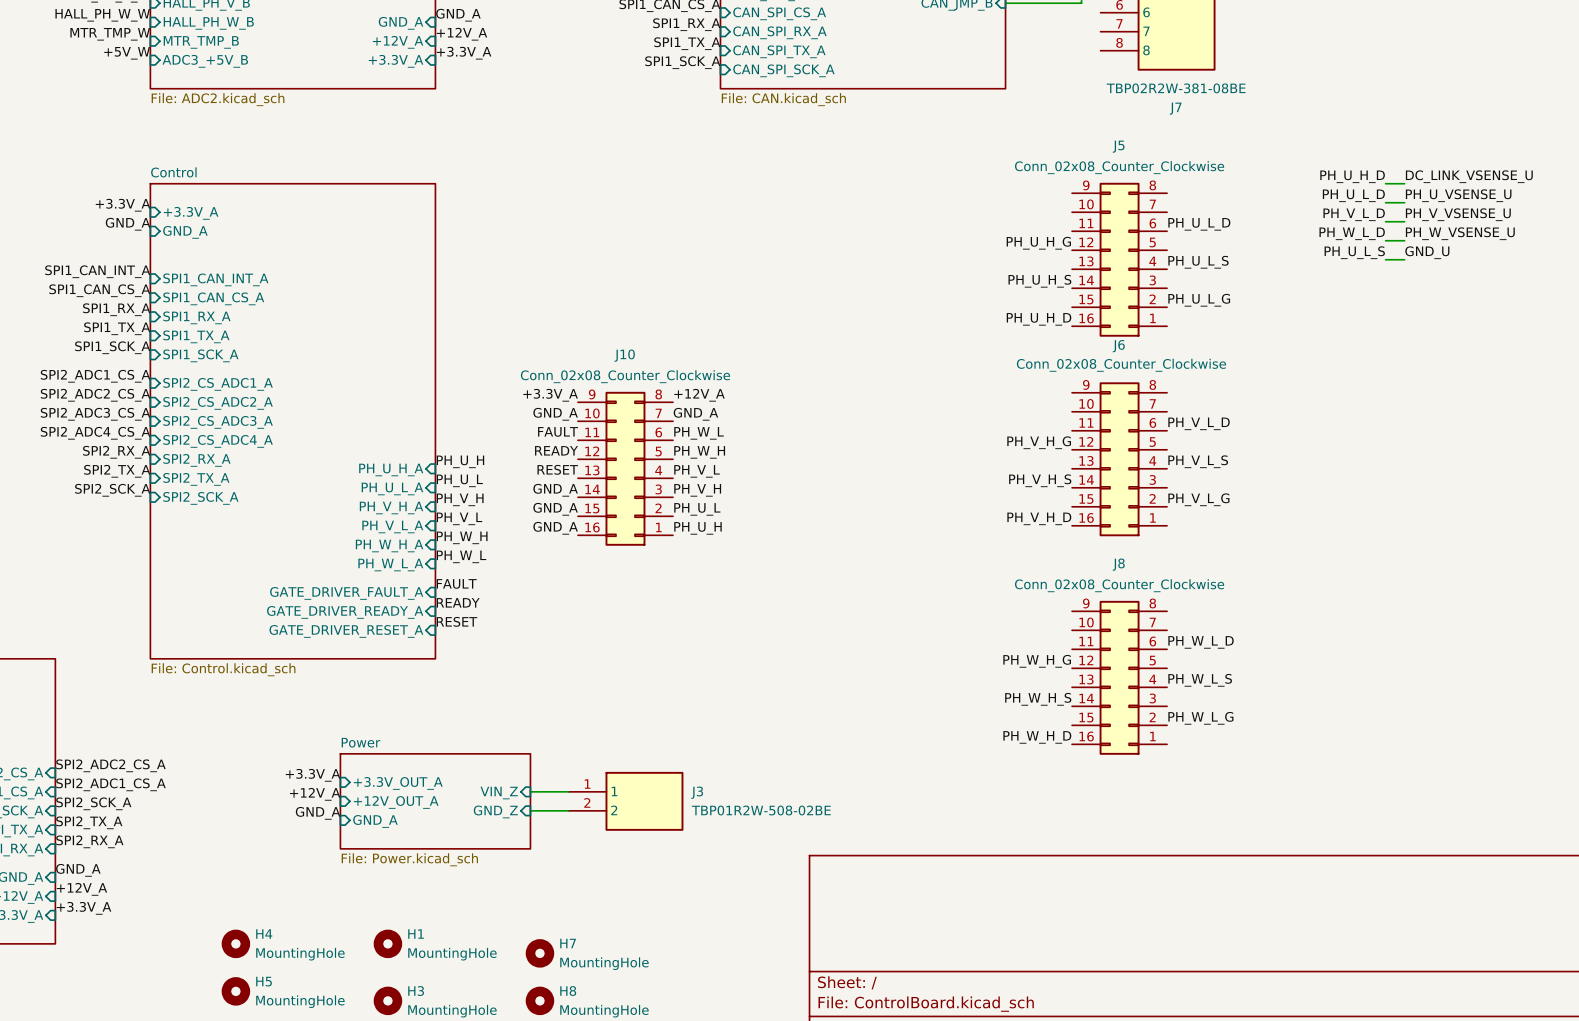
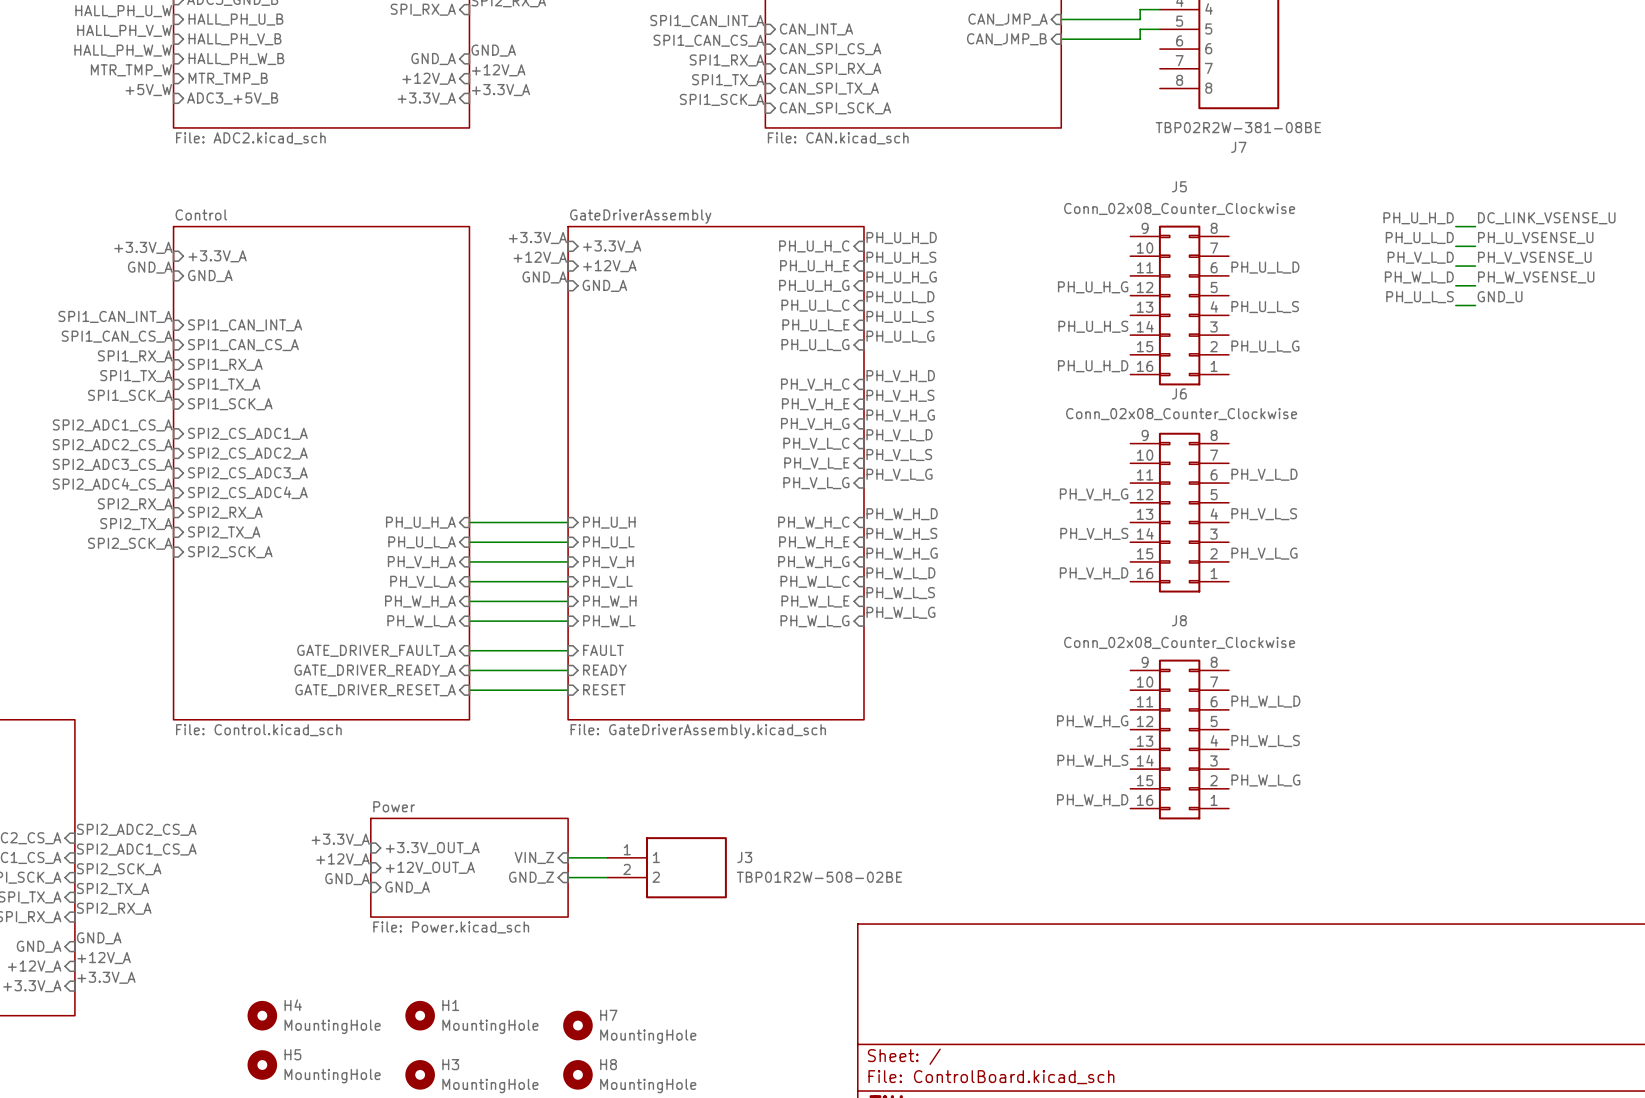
label: none -> +3.3V_A (537, 237)
label: none -> PH_U_H_D (901, 237)
sheet pin: none -> +3.3V_A (612, 246)
sheet pin: none -> PH_U_H_C (814, 246)
label: none -> +12V_A (540, 257)
label: none -> PH_U_H_S (901, 257)
sheet pin: none -> +12V_A (609, 266)
sheet pin: none -> PH_U_H_E (814, 266)
label: none -> GND_A (544, 277)
label: none -> PH_U_H_G (901, 277)
sheet pin: none -> GND_A (604, 285)
sheet pin: none -> PH_U_H_G (814, 285)
label: none -> PH_U_L_D (900, 297)
sheet pin: none -> PH_U_L_C (815, 305)
label: none -> PH_U_L_S (900, 316)
sheet pin: none -> PH_U_L_E (815, 325)
label: none -> PH_U_L_G (900, 336)
sheet pin: none -> PH_U_L_G (815, 345)
label: none -> PH_V_H_D (900, 376)
sheet pin: none -> PH_V_H_C (815, 384)
label: none -> PH_V_H_S (900, 395)
sheet pin: none -> PH_V_H_E (815, 404)
label: none -> PH_V_H_G (900, 415)
sheet pin: none -> PH_V_H_G (815, 423)
label: none -> PH_V_L_D (899, 435)
sheet pin: none -> PH_V_L_C (816, 443)
label: +3.3V_A (550, 395) -> none
label: +12V_A (699, 395) -> none
label: none -> PH_V_L_S (899, 454)
sheet pin: none -> PH_V_L_E (816, 463)
label: GND_A (555, 414) -> none
label: GND_A (695, 414) -> none
sheet GateDriverAssembly: none -> File: GateDriverAssembly.kicad_sch (716, 473)
label: none -> PH_V_L_G (899, 474)
label: FAULT (558, 431) -> none
sheet pin: none -> PH_V_L_G (816, 483)
label: PH_W_L (699, 433) -> none
label: READY (556, 450) -> none
label: PH_W_H (699, 452) -> none
label: PH_U_H (460, 461) -> none
label: none -> PH_W_H_D (902, 514)
wire: none -> (469, 522) (568, 522)
J10: Conn_02x08_Counter_Clockwise (625, 468) -> none
label: RESET (557, 469) -> none
sheet pin: none -> PH_U_H (609, 522)
sheet pin: none -> PH_W_H_C (813, 522)
label: PH_V_L (697, 471) -> none
label: PH_U_L (459, 480) -> none
label: none -> PH_W_H_S (901, 533)
wire: none -> (469, 542) (568, 542)
sheet pin: none -> PH_U_L (608, 542)
sheet pin: none -> PH_W_H_E (814, 542)
label: GND_A (555, 490) -> none
label: PH_V_H (697, 490) -> none
label: PH_V_H (460, 499) -> none
label: none -> PH_W_H_G (902, 553)
wire: none -> (469, 561) (568, 561)
sheet pin: none -> PH_V_H (608, 562)
sheet pin: none -> PH_W_H_G (813, 562)
label: GND_A (555, 509) -> none
label: PH_U_L (697, 509) -> none
label: PH_V_L (459, 518) -> none
label: none -> PH_W_L_D (900, 573)
wire: none -> (469, 581) (568, 581)
sheet pin: none -> PH_V_L (607, 581)
sheet pin: none -> PH_W_L_C (814, 581)
label: GND_A (555, 528) -> none
label: PH_U_H (697, 528) -> none
label: PH_W_H (462, 537) -> none
label: none -> PH_W_L_S (900, 593)
wire: none -> (469, 601) (568, 601)
sheet pin: none -> PH_W_H (609, 601)
sheet pin: none -> PH_W_L_E (815, 601)
label: PH_W_L (461, 556) -> none
label: none -> PH_W_L_G (900, 612)
wire: none -> (469, 621) (568, 621)
sheet pin: none -> PH_W_L (609, 621)
sheet pin: none -> PH_W_L_G (814, 621)
label: FAULT (456, 583) -> none
wire: none -> (469, 650) (568, 650)
sheet pin: none -> FAULT (603, 650)
label: READY (458, 602) -> none
sheet pin: none -> READY (604, 670)
wire: none -> (469, 670) (568, 670)
label: RESET (456, 621) -> none
sheet pin: none -> RESET (604, 689)
wire: none -> (469, 690) (568, 690)

